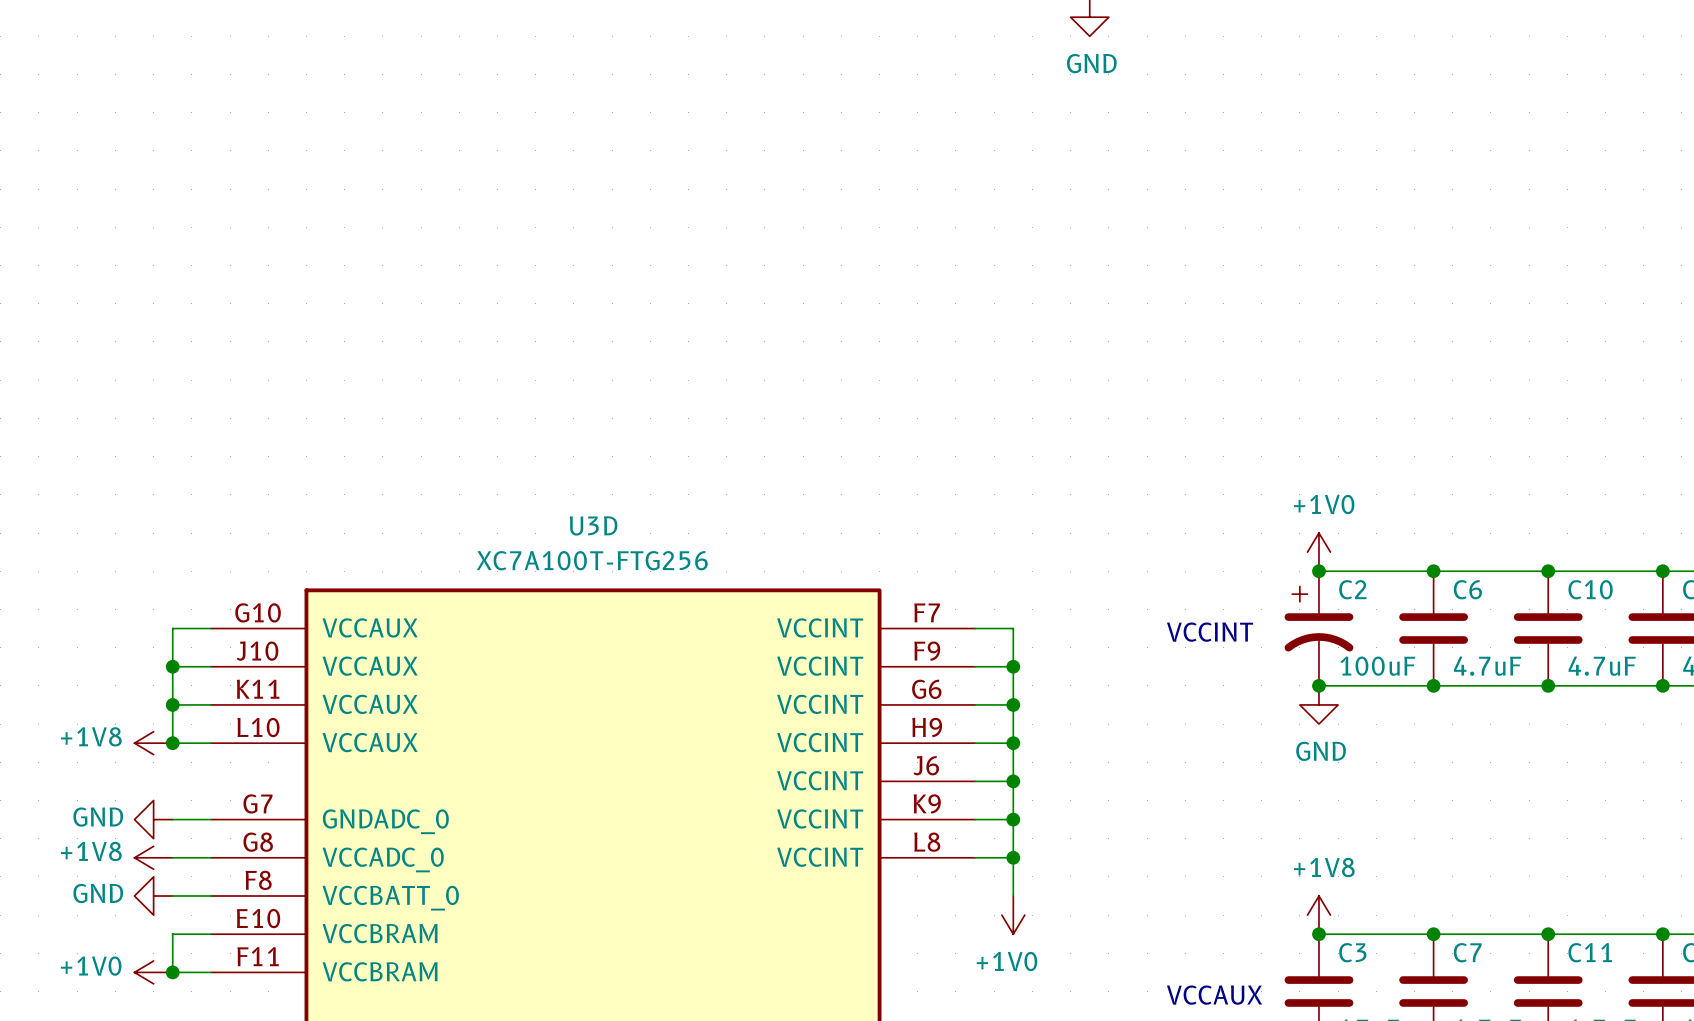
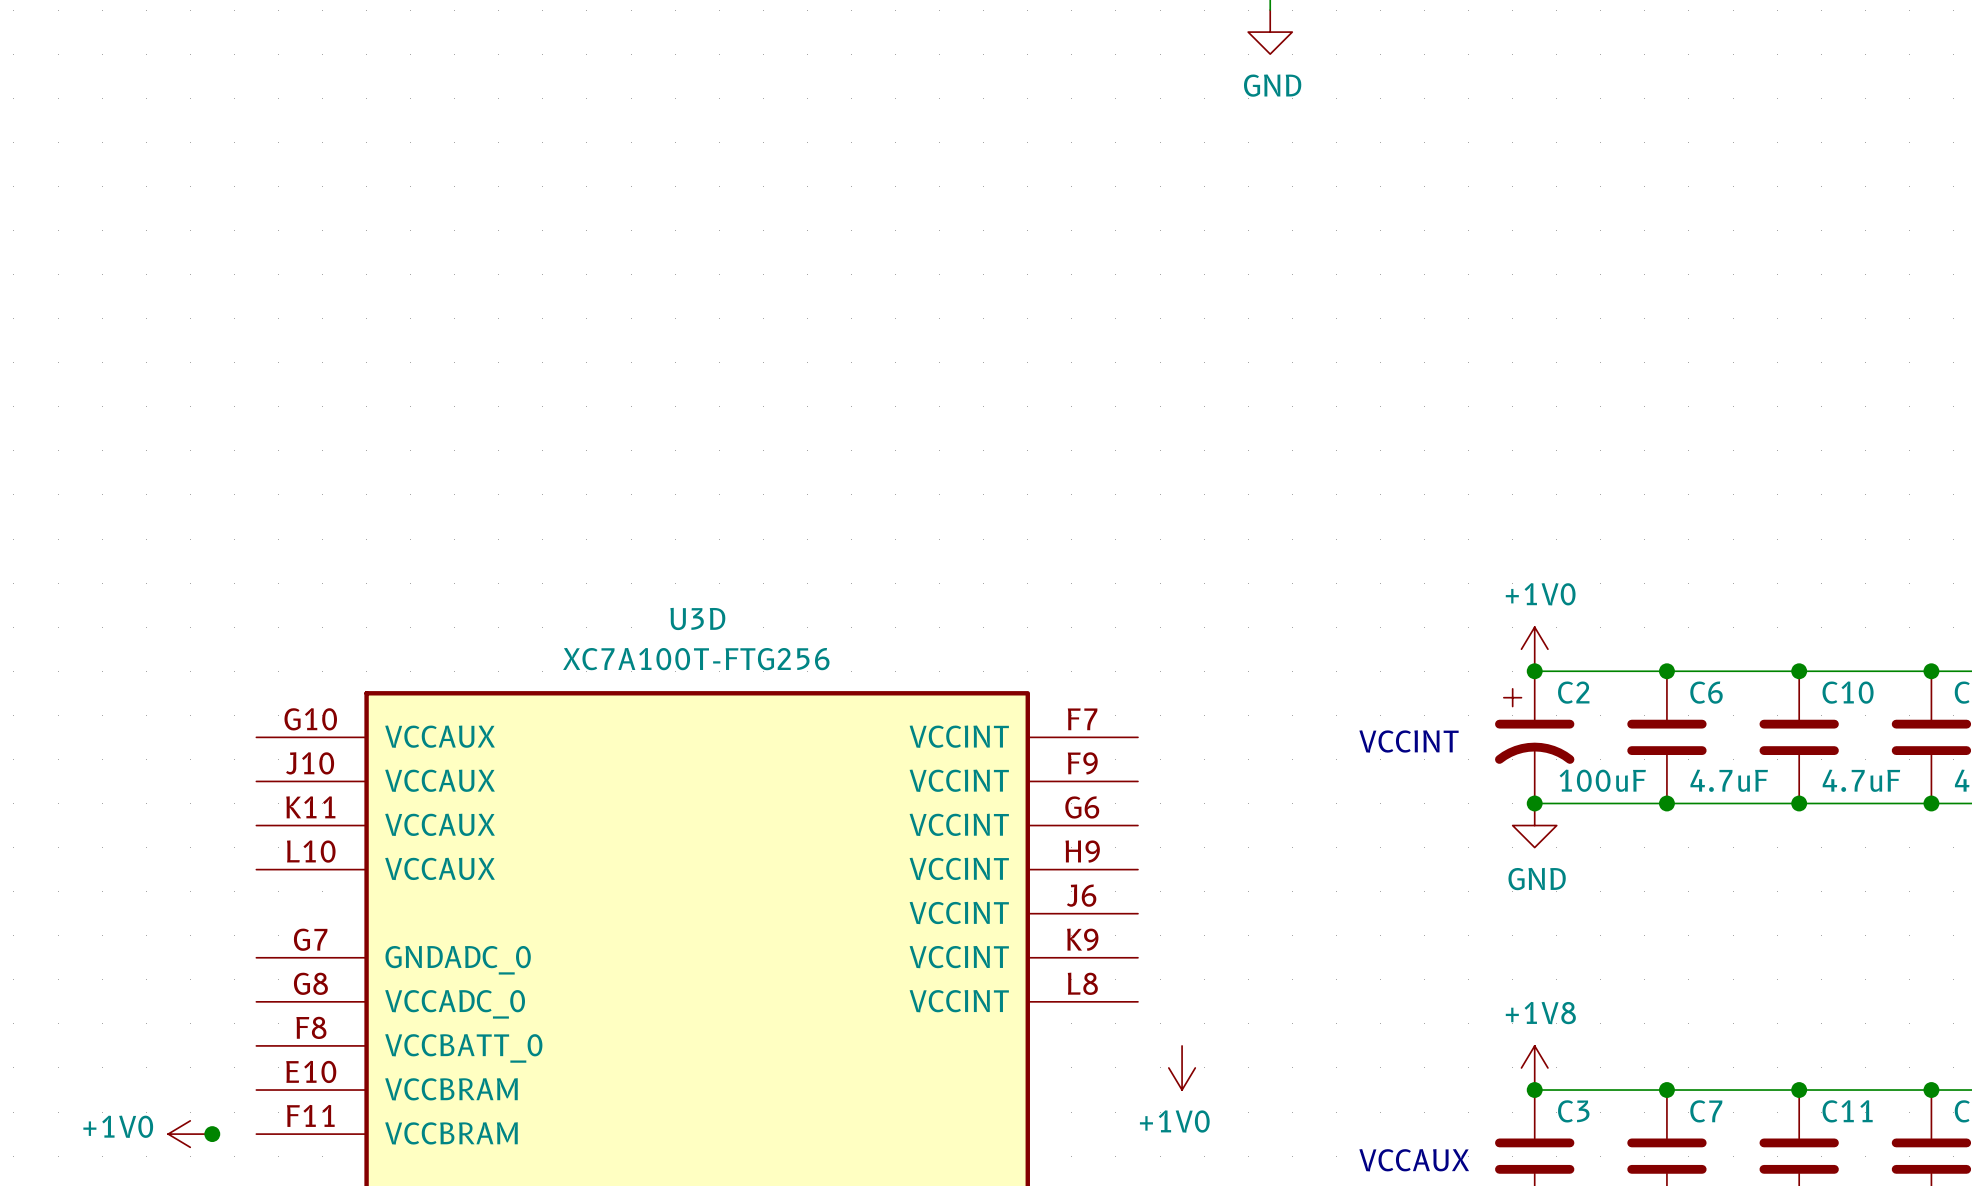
wire: (210, 628) (172, 628) (172, 743) (210, 743) -> none
wire: (975, 628) (1013, 628) (1013, 896) -> none
wire: (172, 666) (210, 666) -> none
junction: (172, 666) -> none
wire: (975, 666) (1013, 666) -> none
junction: (1013, 666) -> none
wire: (172, 704) (210, 704) -> none
junction: (172, 704) -> none
wire: (975, 704) (1013, 704) -> none
junction: (1013, 704) -> none
power symbol: +1V8 (153, 743) -> none
junction: (172, 743) -> none
wire: (975, 743) (1013, 743) -> none
junction: (1013, 743) -> none
wire: (975, 781) (1013, 781) -> none
junction: (1013, 781) -> none
power symbol: GND (153, 819) -> none
wire: (172, 819) (210, 819) -> none
wire: (975, 819) (1013, 819) -> none
junction: (1013, 819) -> none
power symbol: +1V8 (153, 857) -> none
wire: (172, 857) (210, 857) -> none
wire: (975, 857) (1013, 857) -> none
junction: (1013, 857) -> none
power symbol: GND (153, 896) -> none
wire: (172, 896) (210, 896) -> none
wire: (210, 934) (172, 934) (172, 972) (210, 972) -> none

